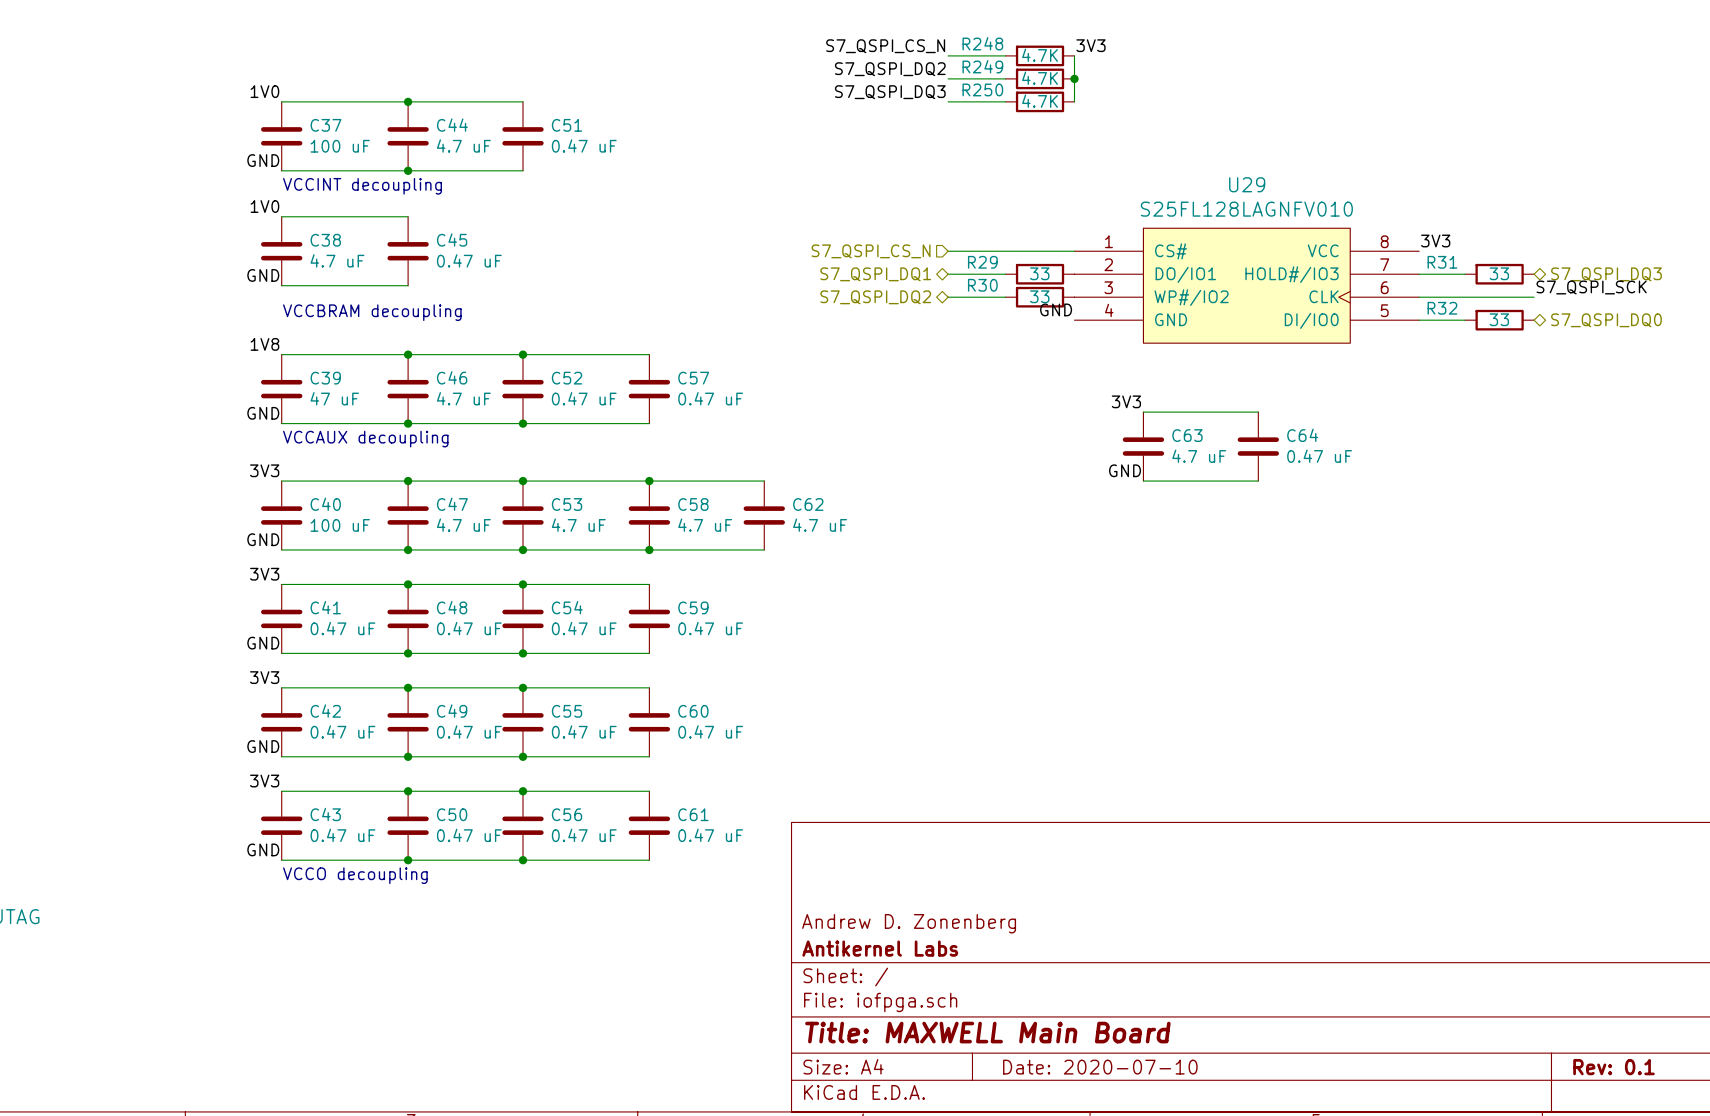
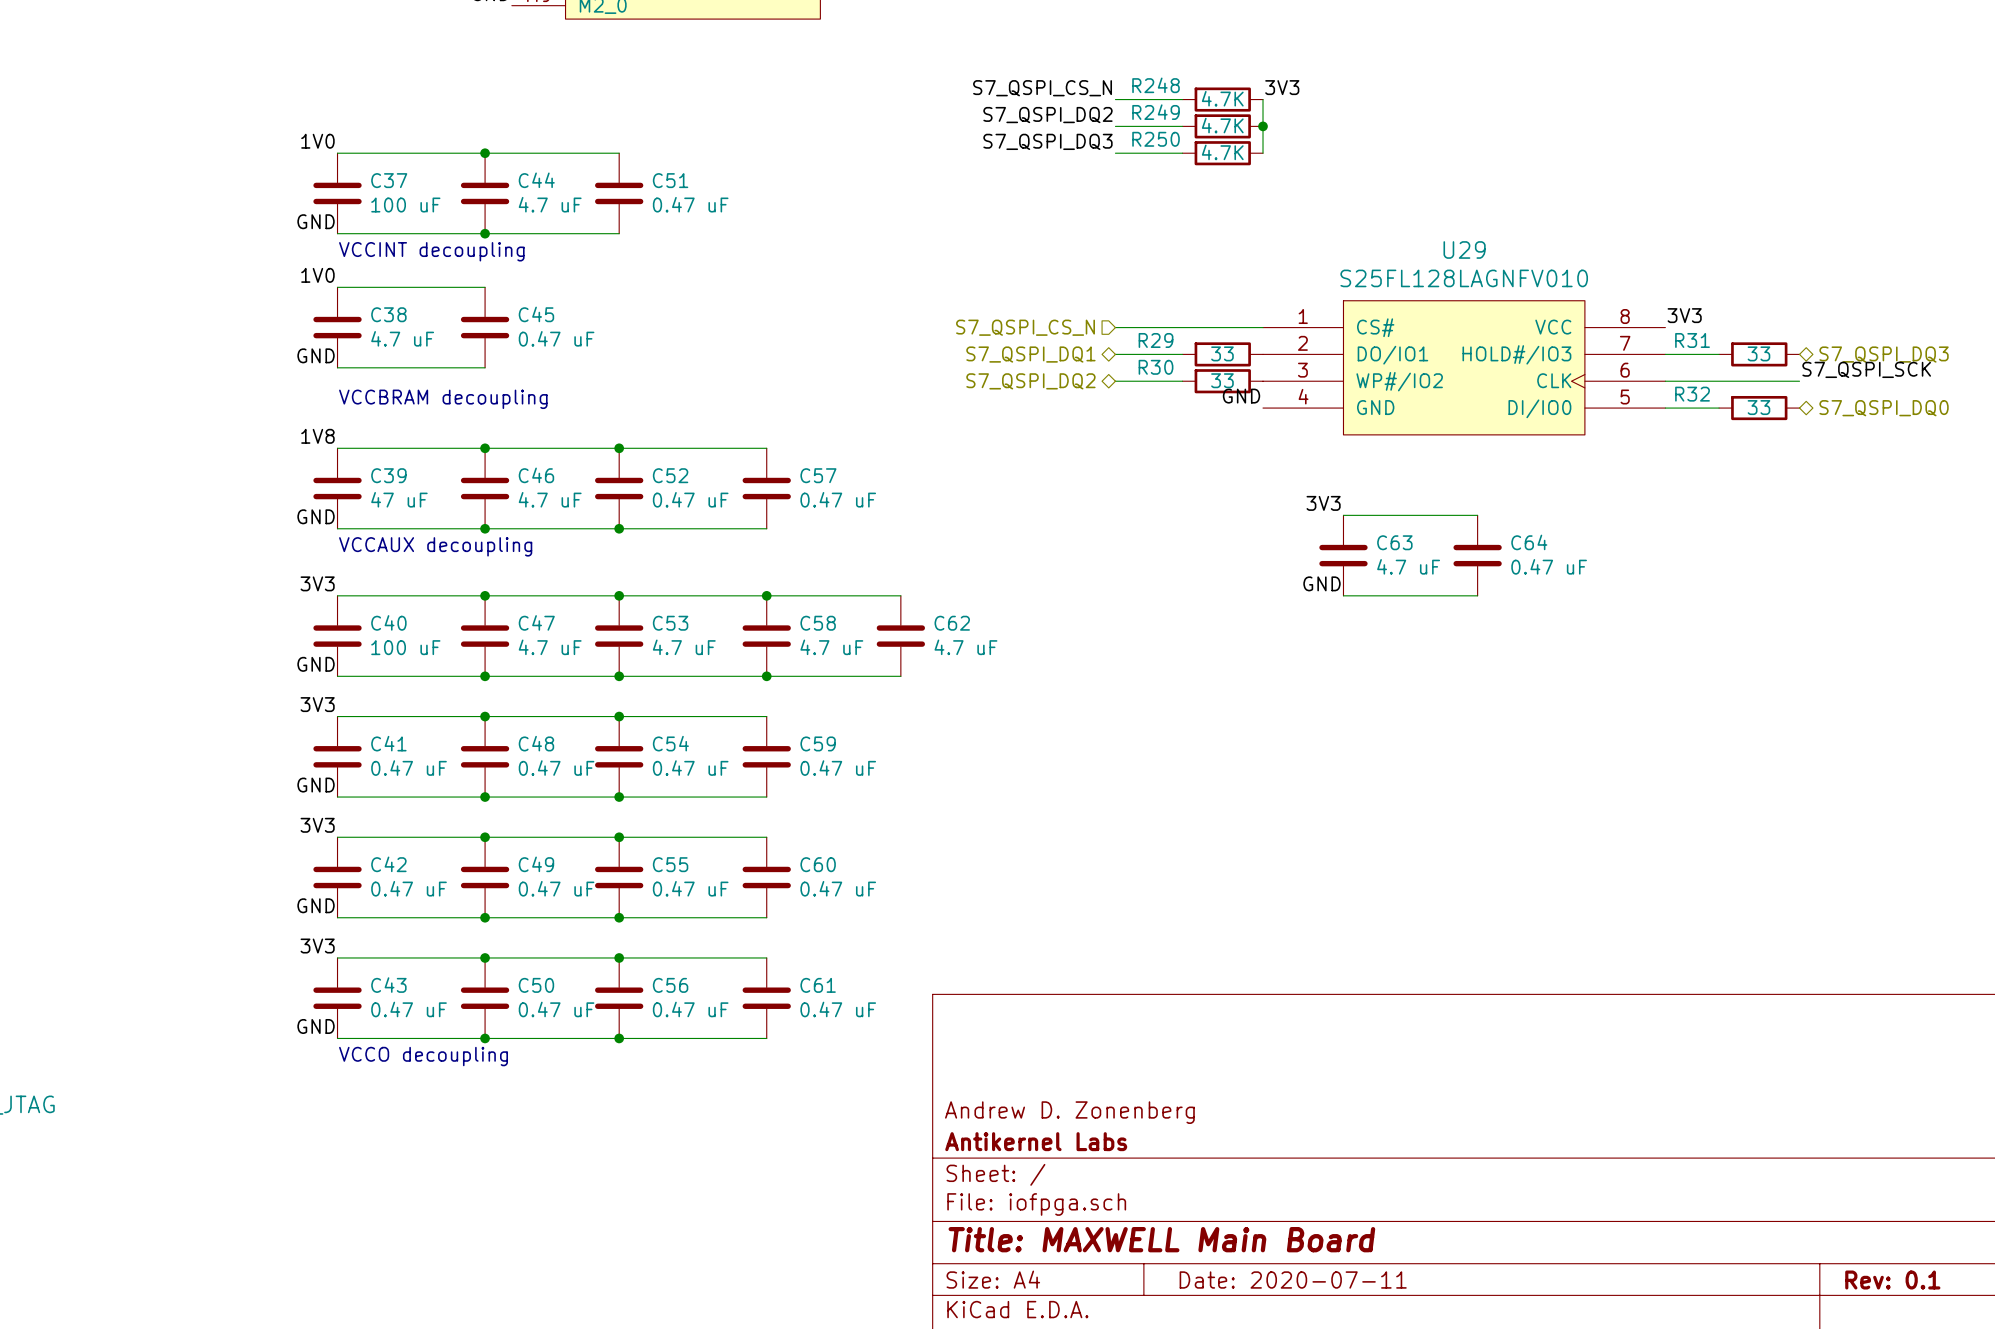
title block: Date: 2020-07-10 (1100, 1067) -> Date: 2020-07-11 (1293, 1280)

